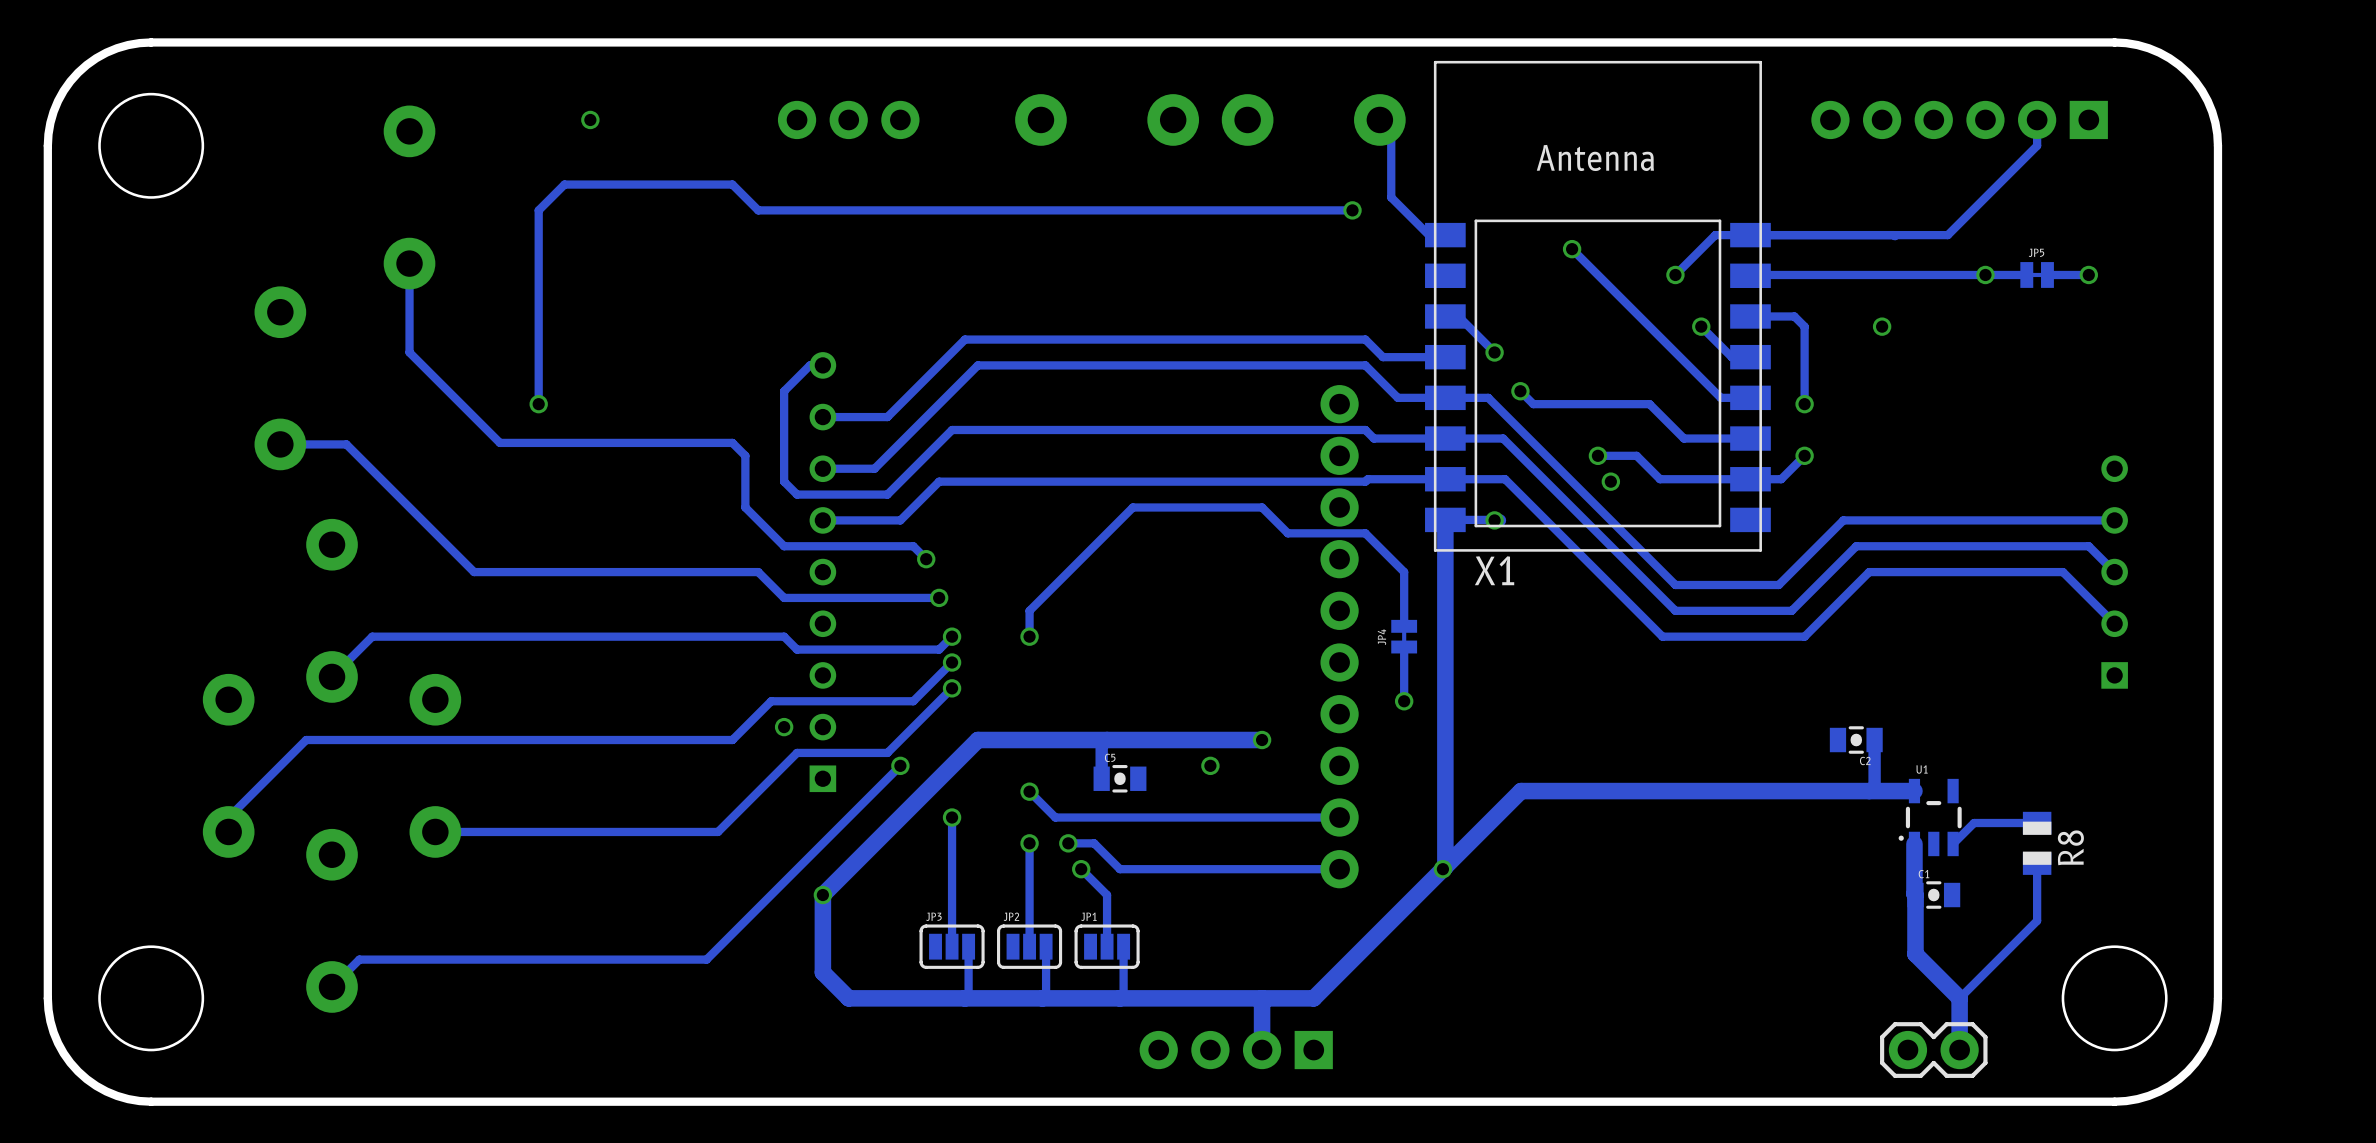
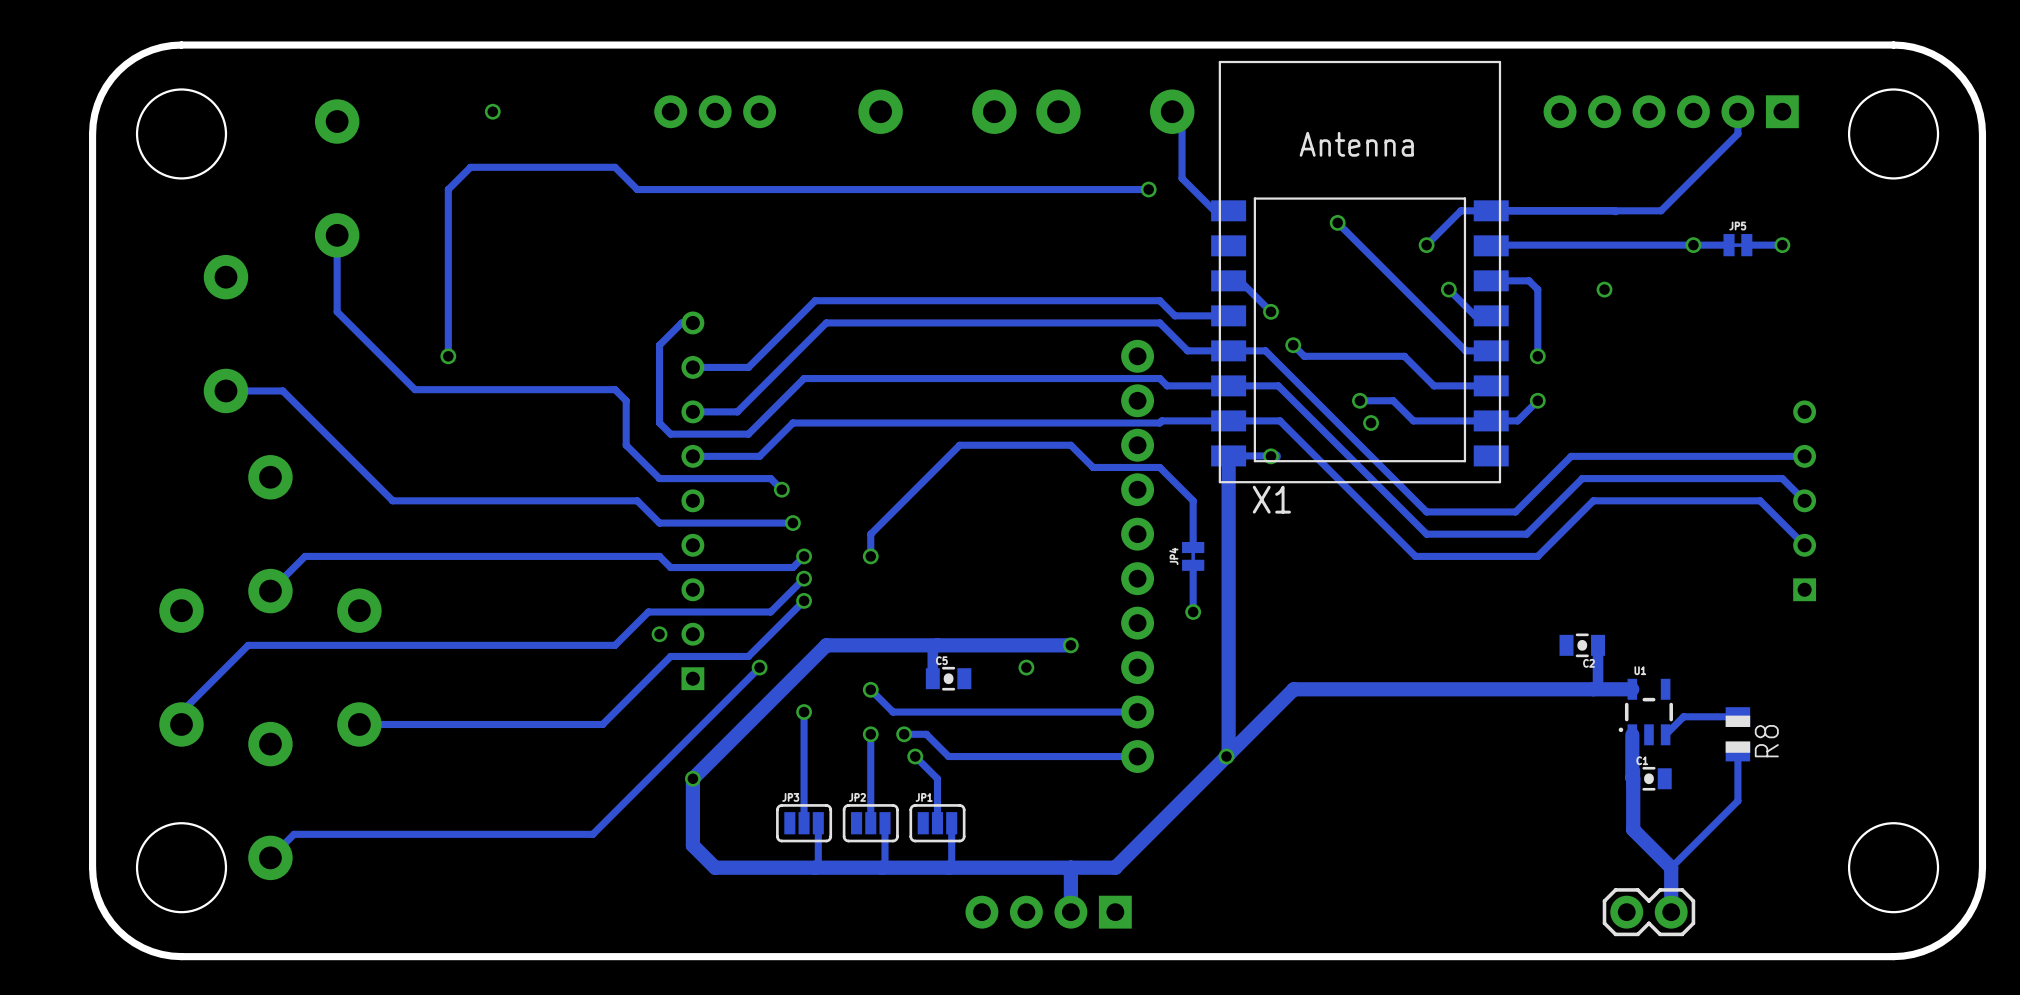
board edge: (228, 42) (139, 43) (117, 48) (96, 58) (78, 72) (63, 90) (50, 122) (47, 145) (47, 998) (50, 1021) (58, 1043) (70, 1062) (86, 1079) (106, 1091) (139, 1101) (228, 1101) -> (181, 45) (161, 47) (142, 53) (118, 71) (101, 95) (94, 114) (92, 133) (93, 877) (101, 906) (118, 930) (142, 947) (161, 954) (181, 956)
board edge: (2114, 42) (2137, 45) (2159, 52) (2187, 72) (2207, 100) (2215, 122) (2217, 145) (2217, 1009) (2207, 1043) (2187, 1071) (2159, 1091) (2137, 1099) (2114, 1101) -> (1804, 45) (1903, 45) (1932, 53) (1956, 71) (1968, 86) (1980, 114) (1982, 133) (1982, 867) (1980, 887) (1968, 915) (1956, 930) (1940, 943) (1922, 951) (1893, 956) (1804, 956)
drawing: none -> [1847, 88, 1940, 180]
drawing position: (151, 145) -> (181, 133)
drawing position: (151, 998) -> (181, 867)
drawing position: (2114, 998) -> (1893, 867)

